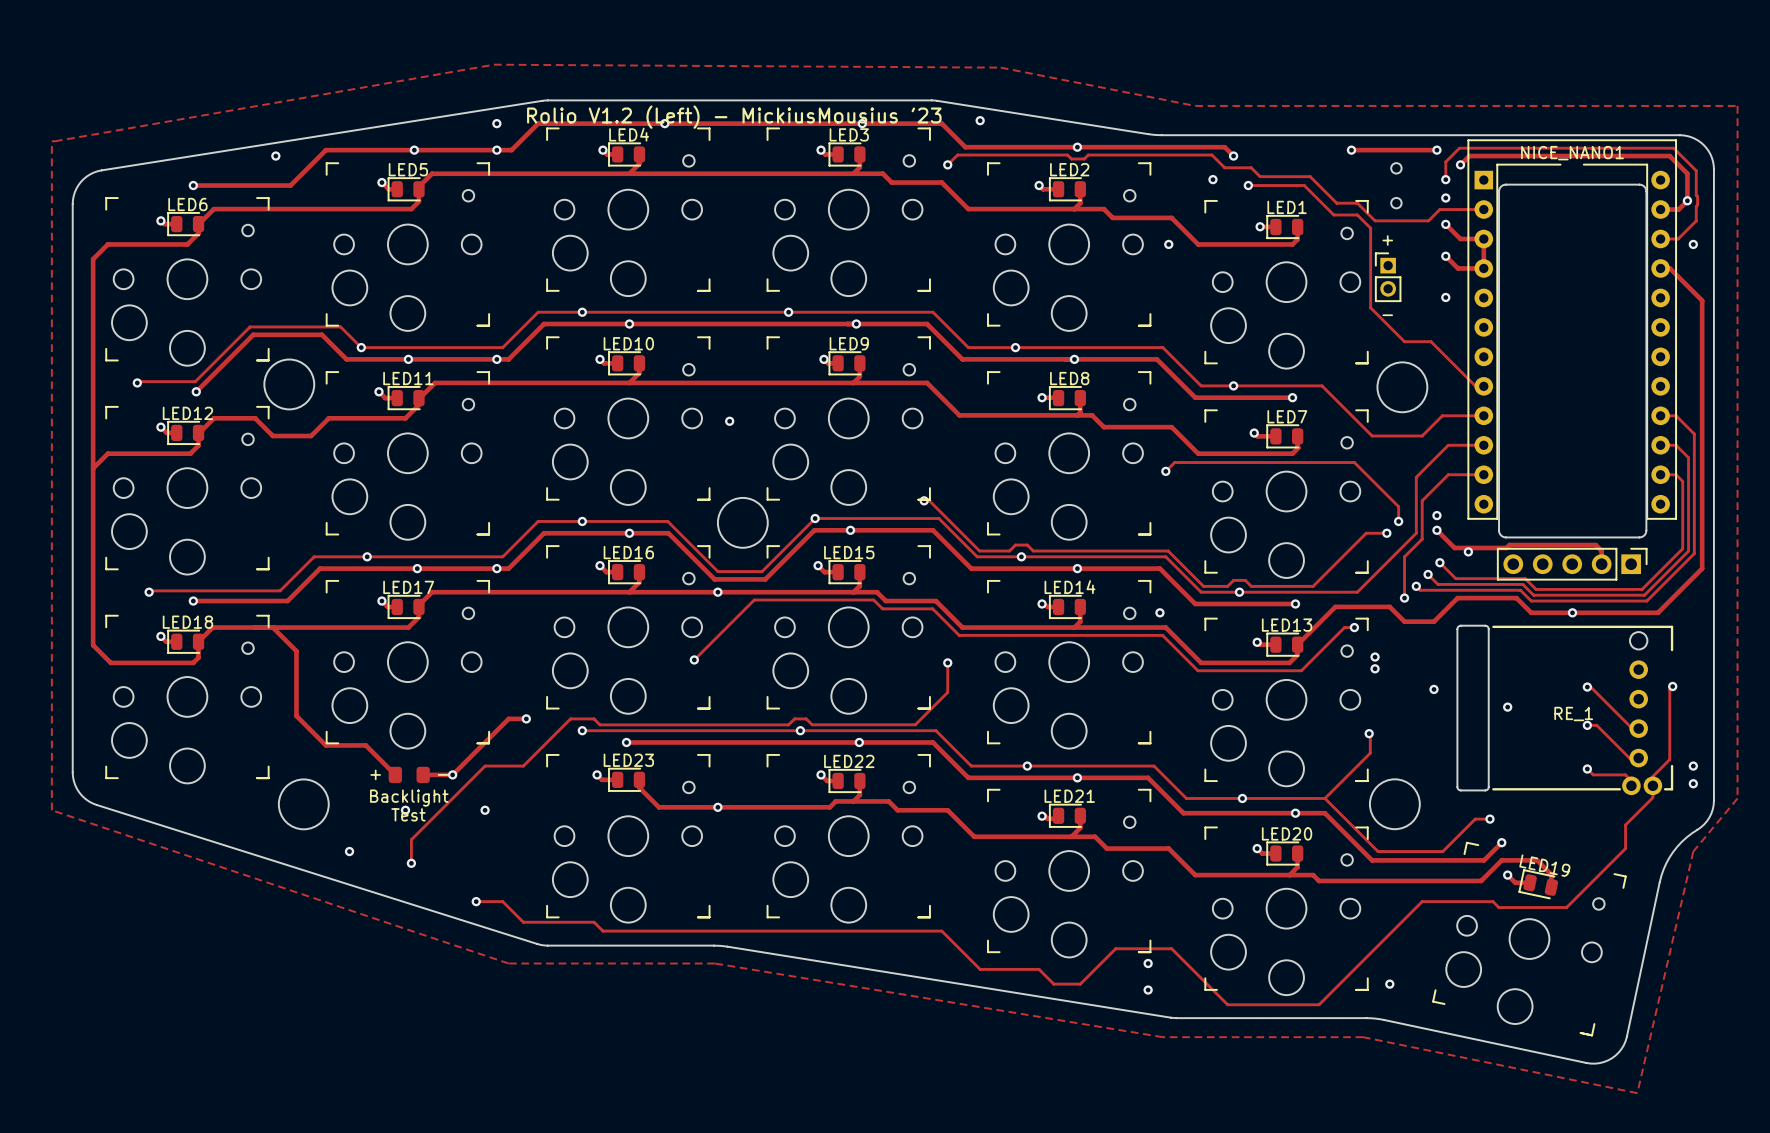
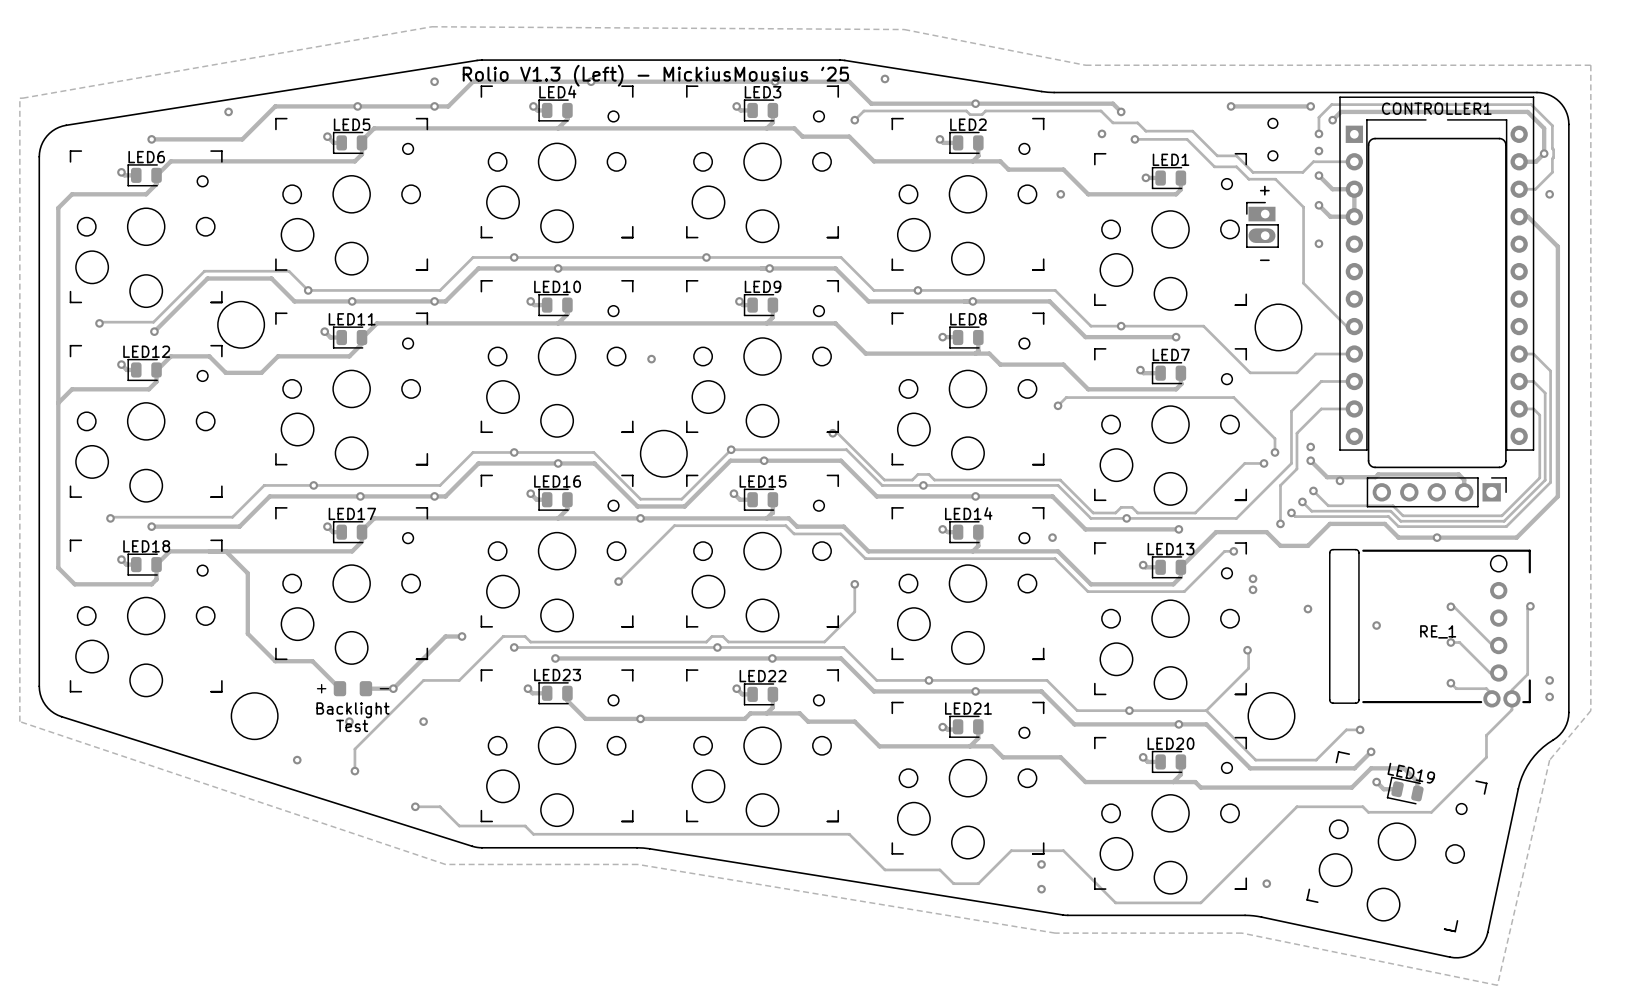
text: Rolio V1.2 (Left) - MickiusMousius '23 (734, 117) -> Rolio V1.3 (Left) - MickiusMousius '25 (655, 75)
NICE_NANO1 name: NICE_NANO1 (1572, 153) -> CONTROLLER1 (1436, 108)
track: (1370, 228) (1370, 307) (1404, 341) (1431, 341) -> (1248, 179) (1275, 179) (1303, 207) (1303, 283) (1305, 284)
part footprint: [1375, 252, 1402, 302] -> [1246, 201, 1279, 248]

